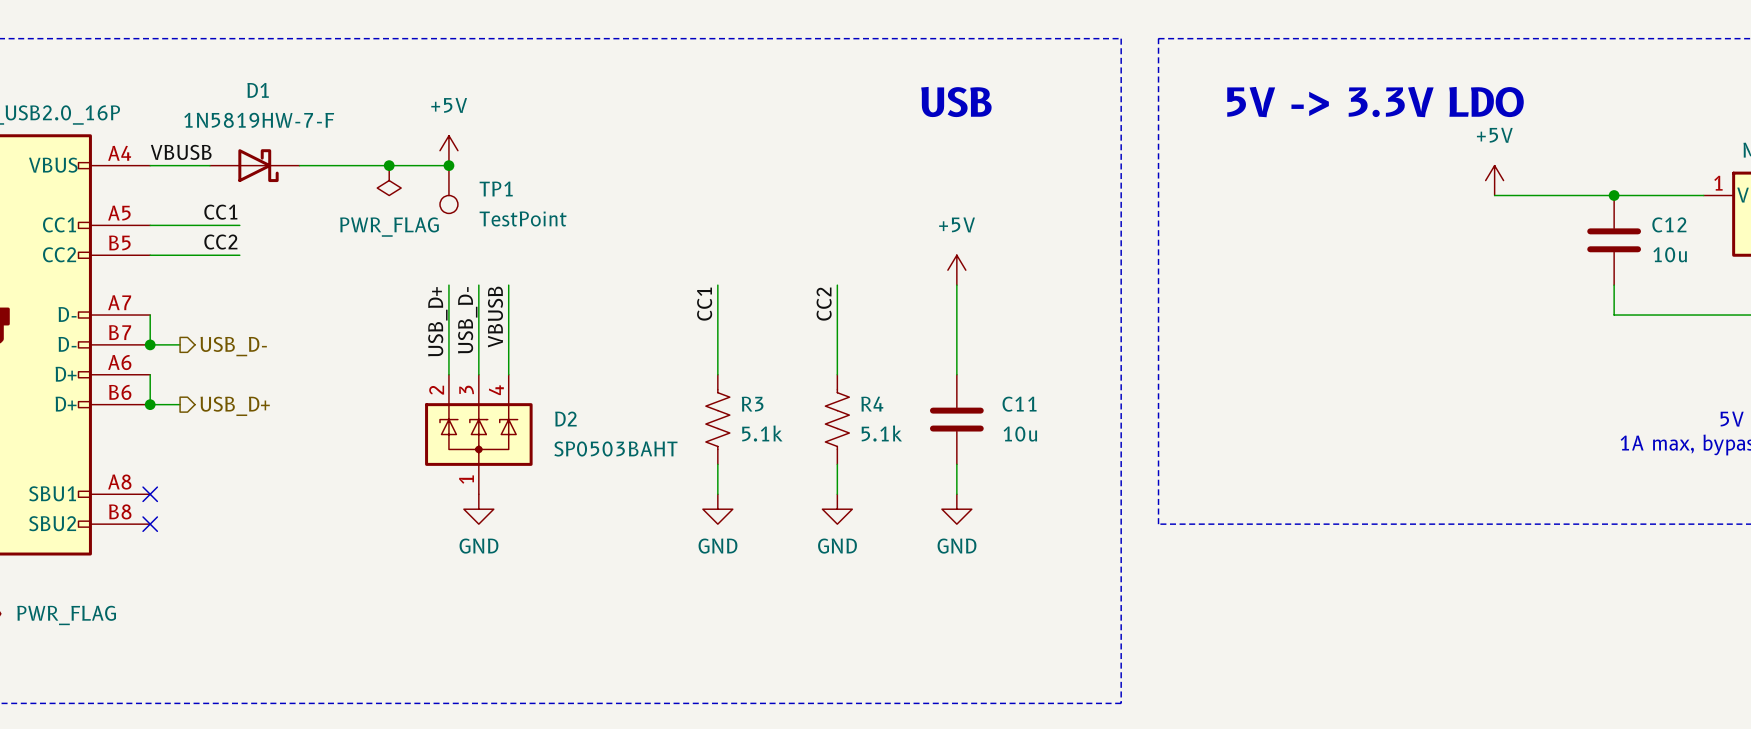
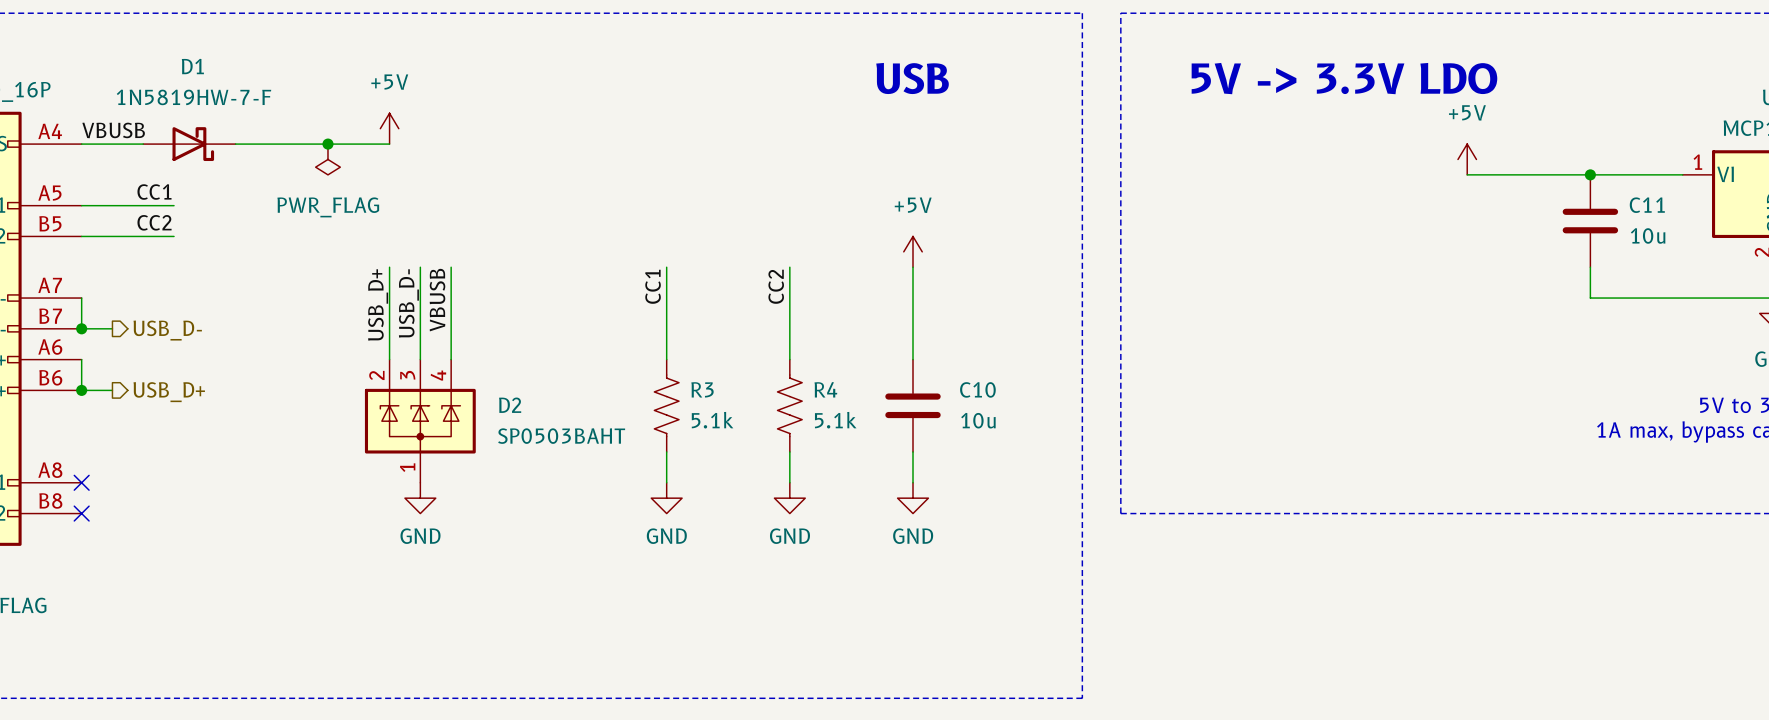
junction: (448, 165) -> none
TP1: TestPoint (448, 189) -> none
C12 name: C12 (1669, 224) -> C11 (1647, 205)
C11 name: C11 (1019, 404) -> C10 (977, 389)

